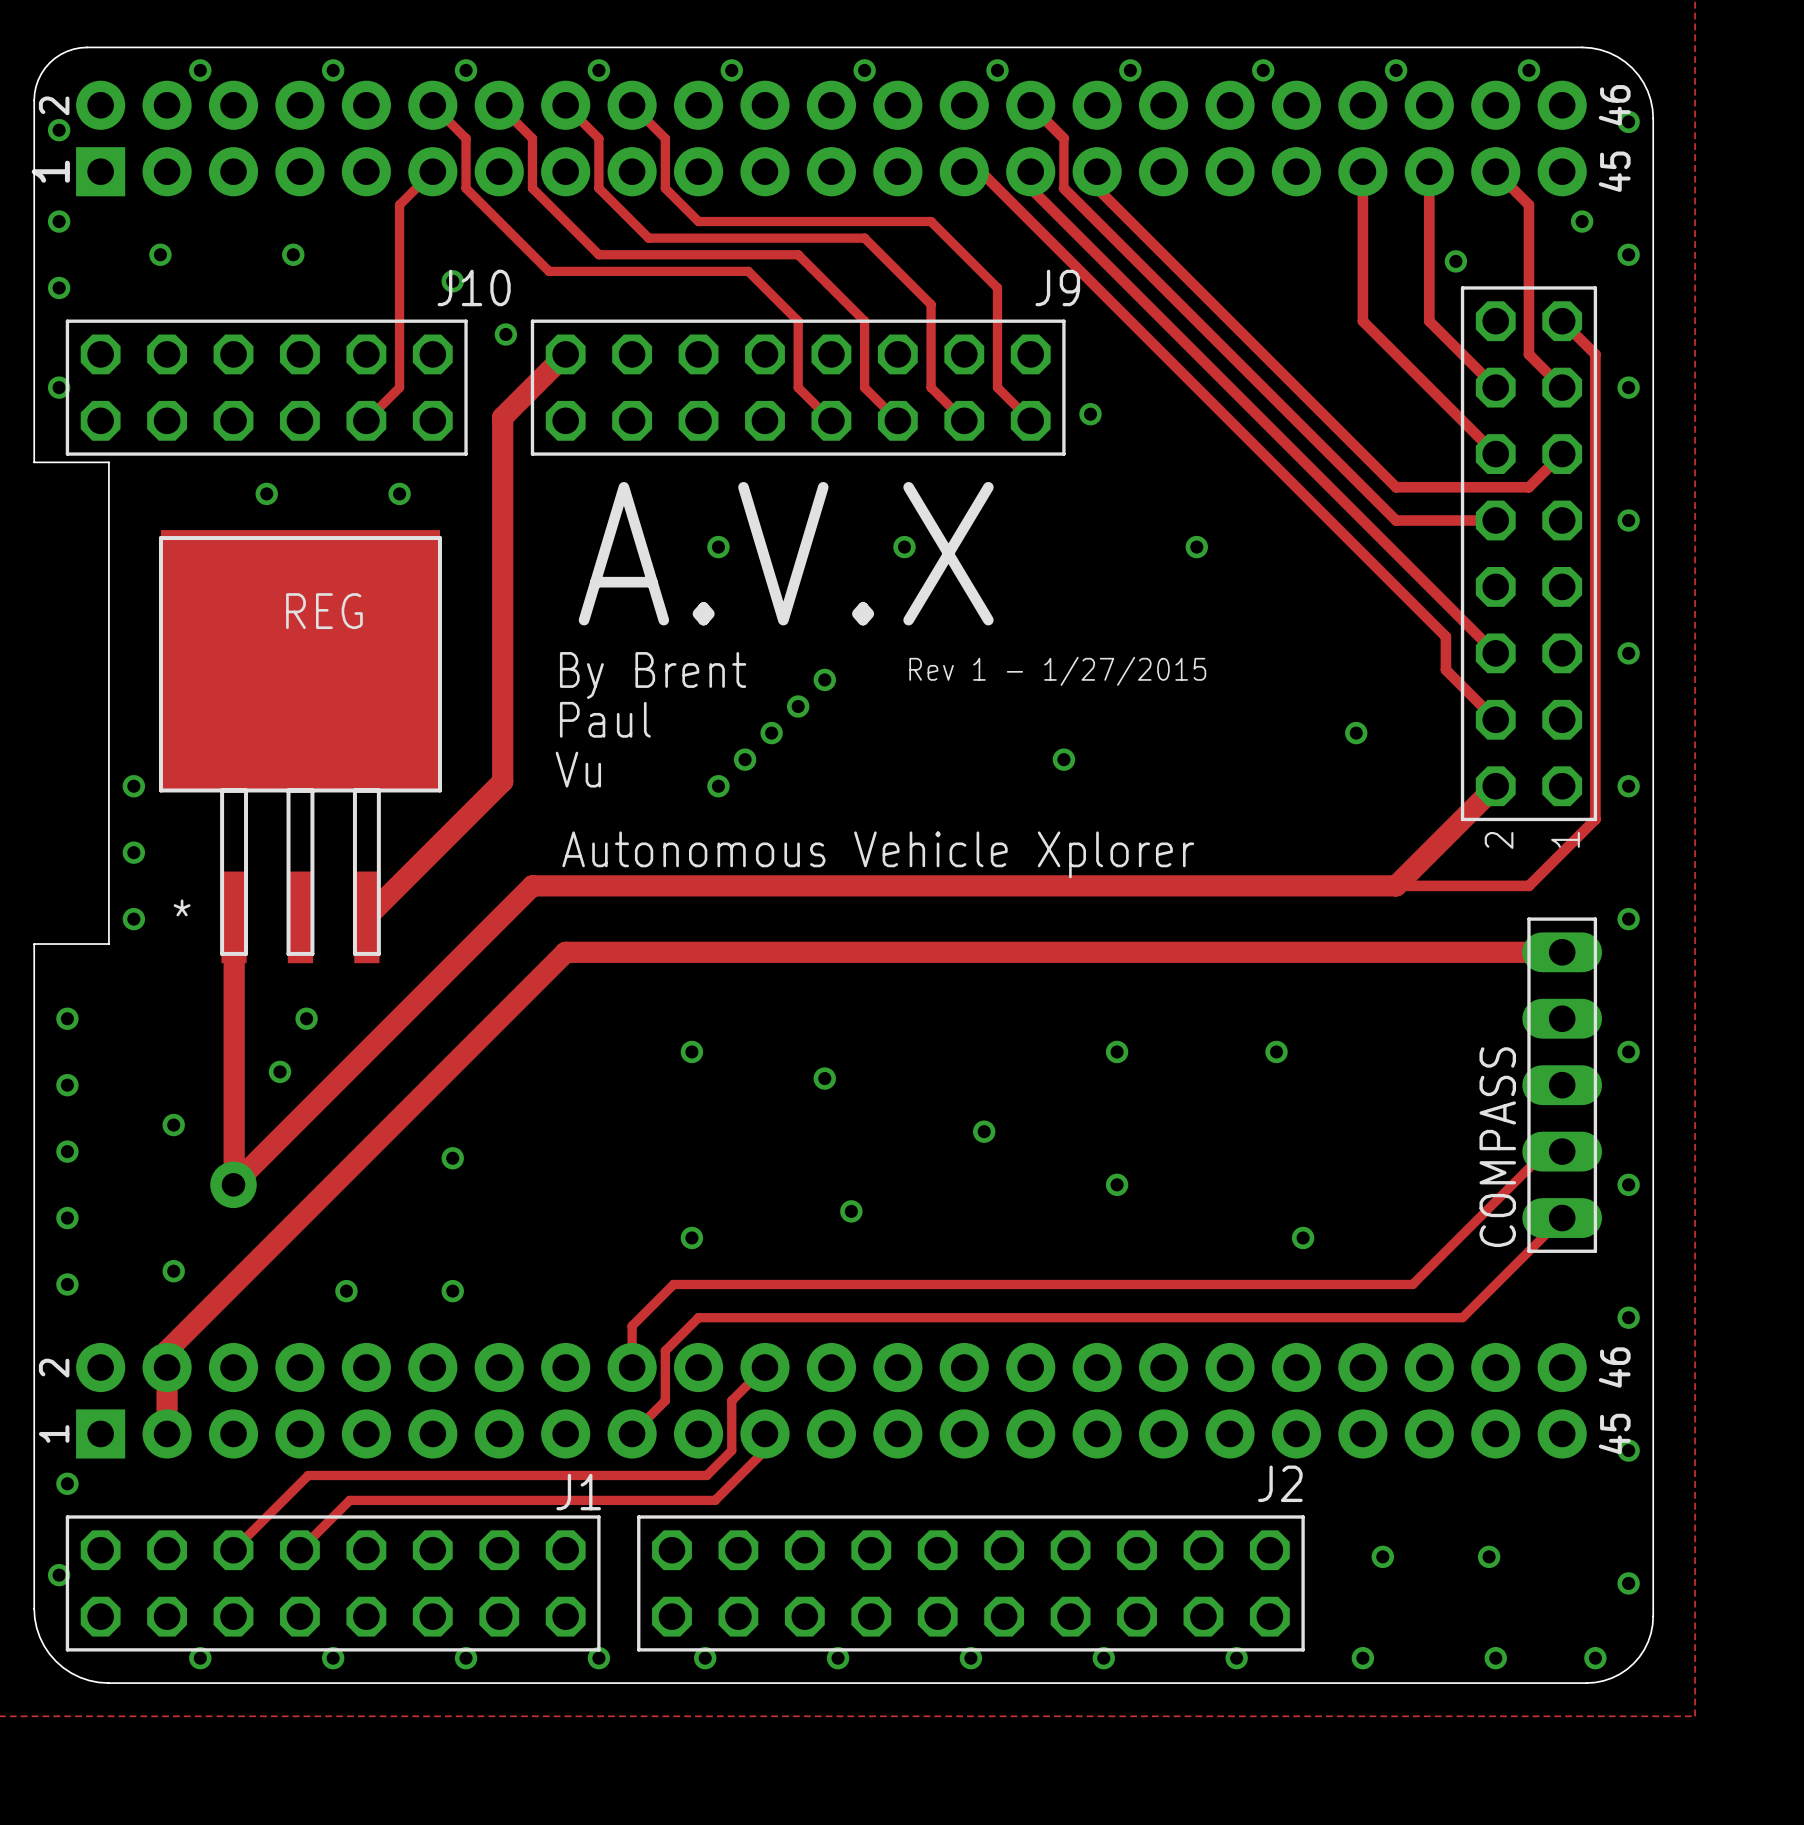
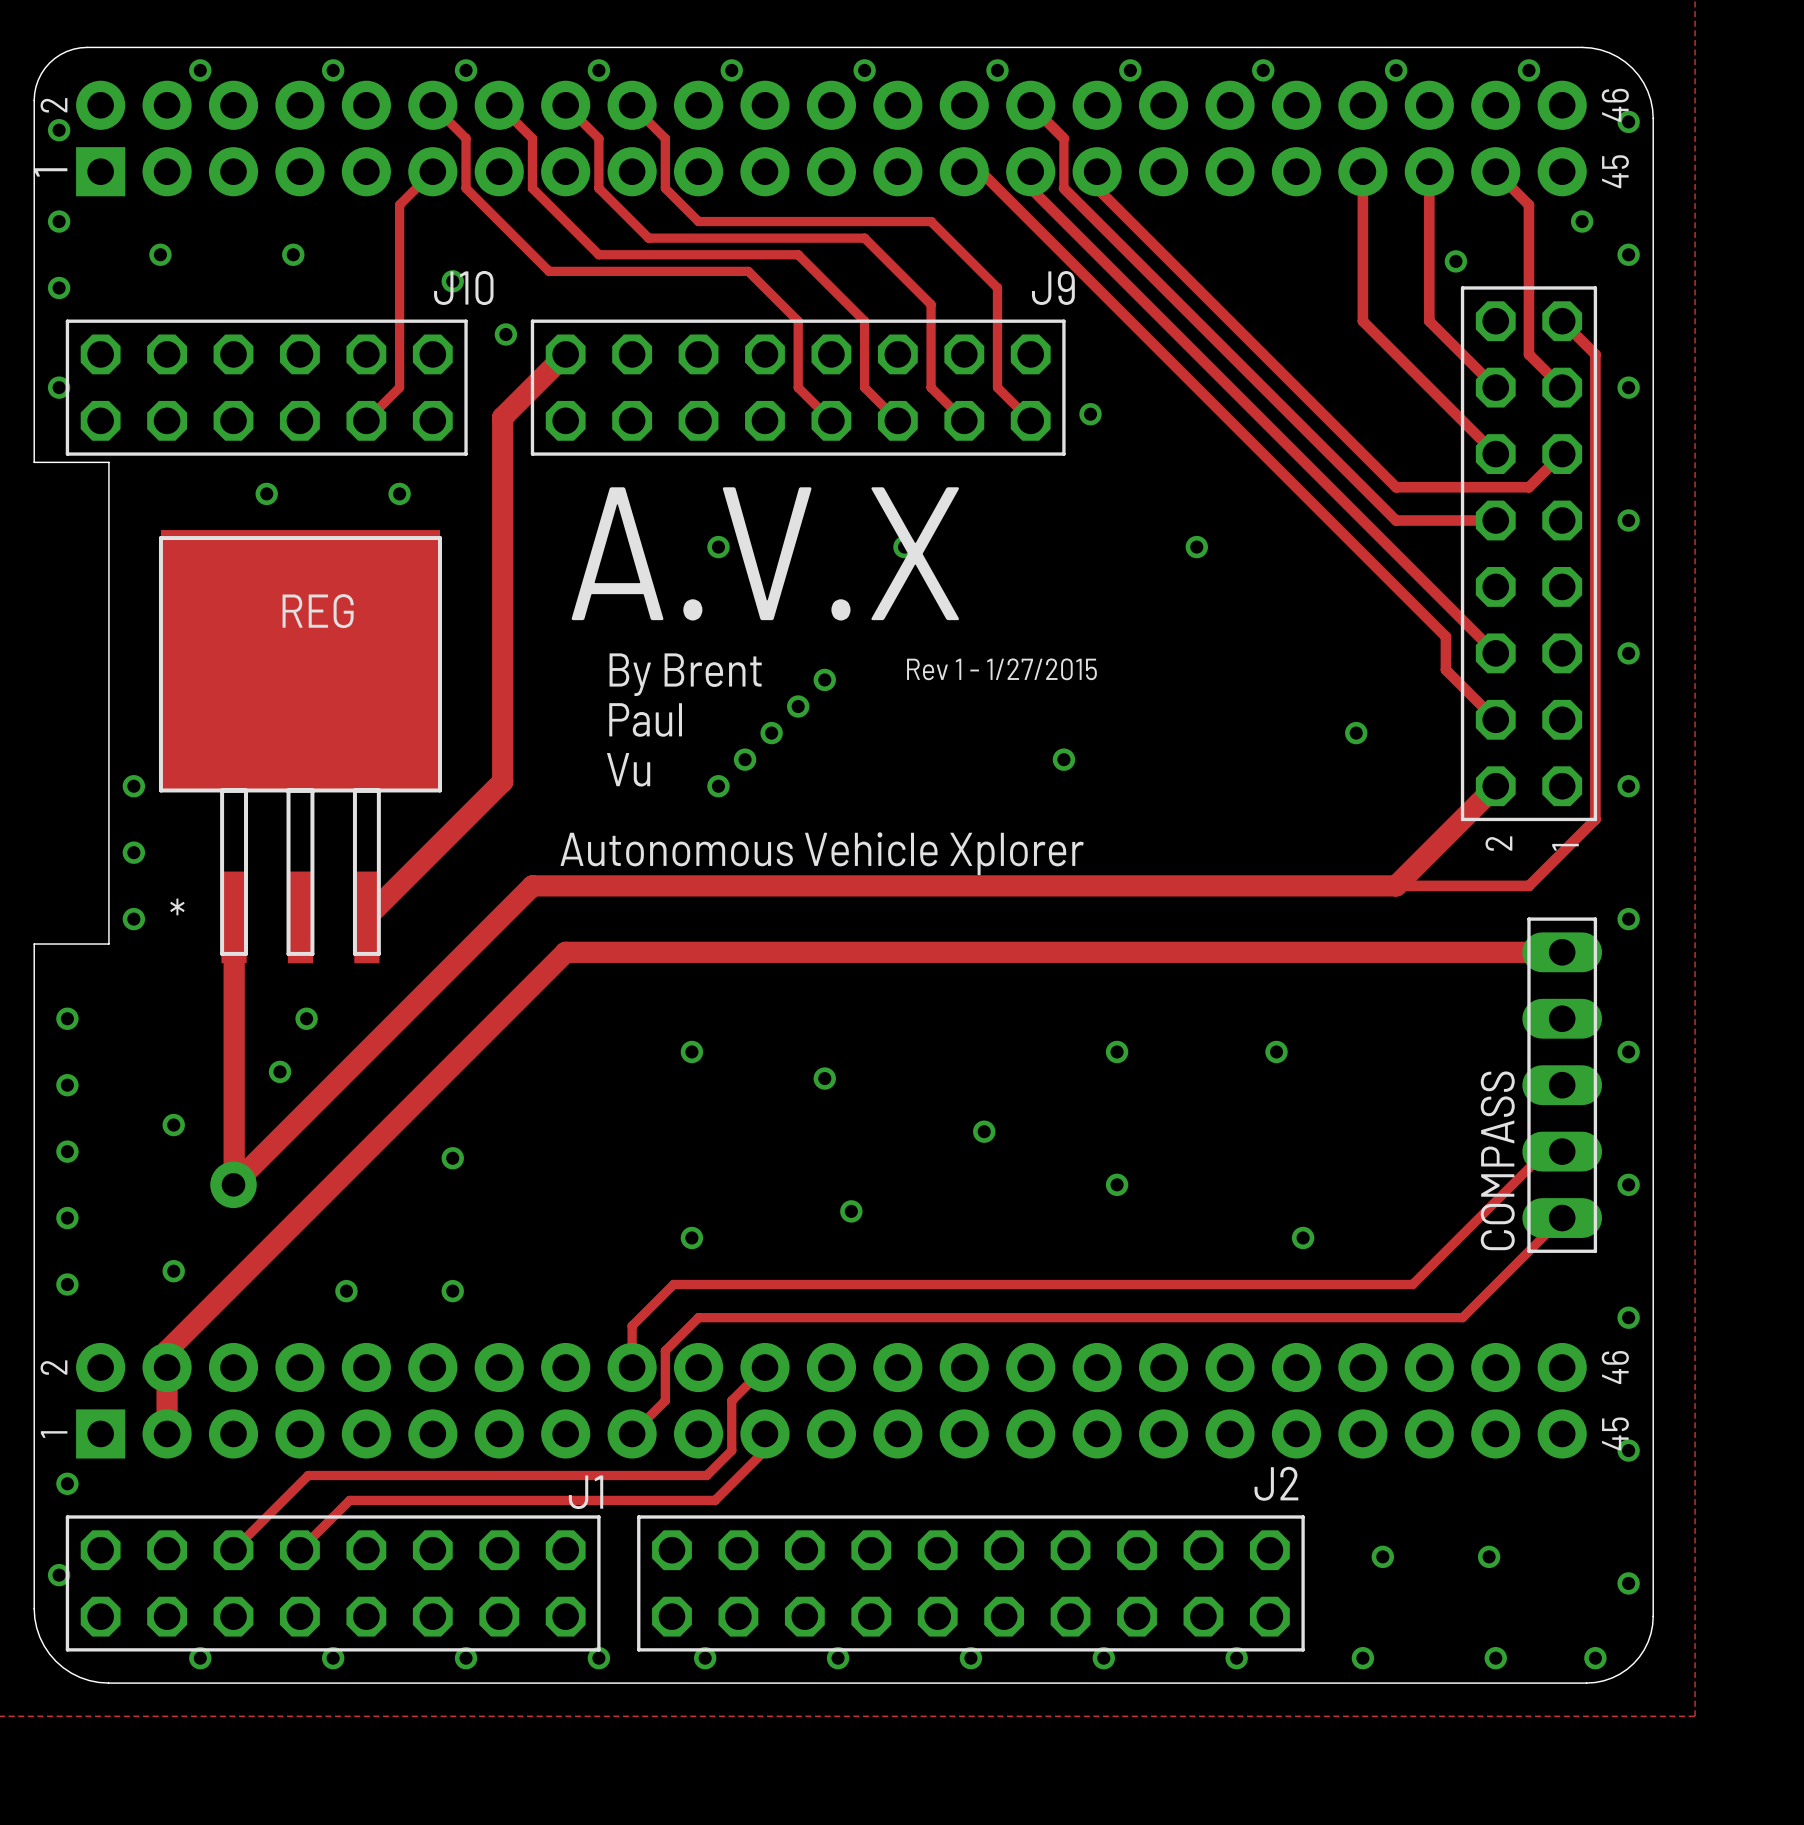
text position: By Brent (653, 675) -> By Brent (685, 674)
text position: Paul (605, 719) -> Paul (645, 719)
text position: Vu (578, 769) -> Vu (628, 769)

